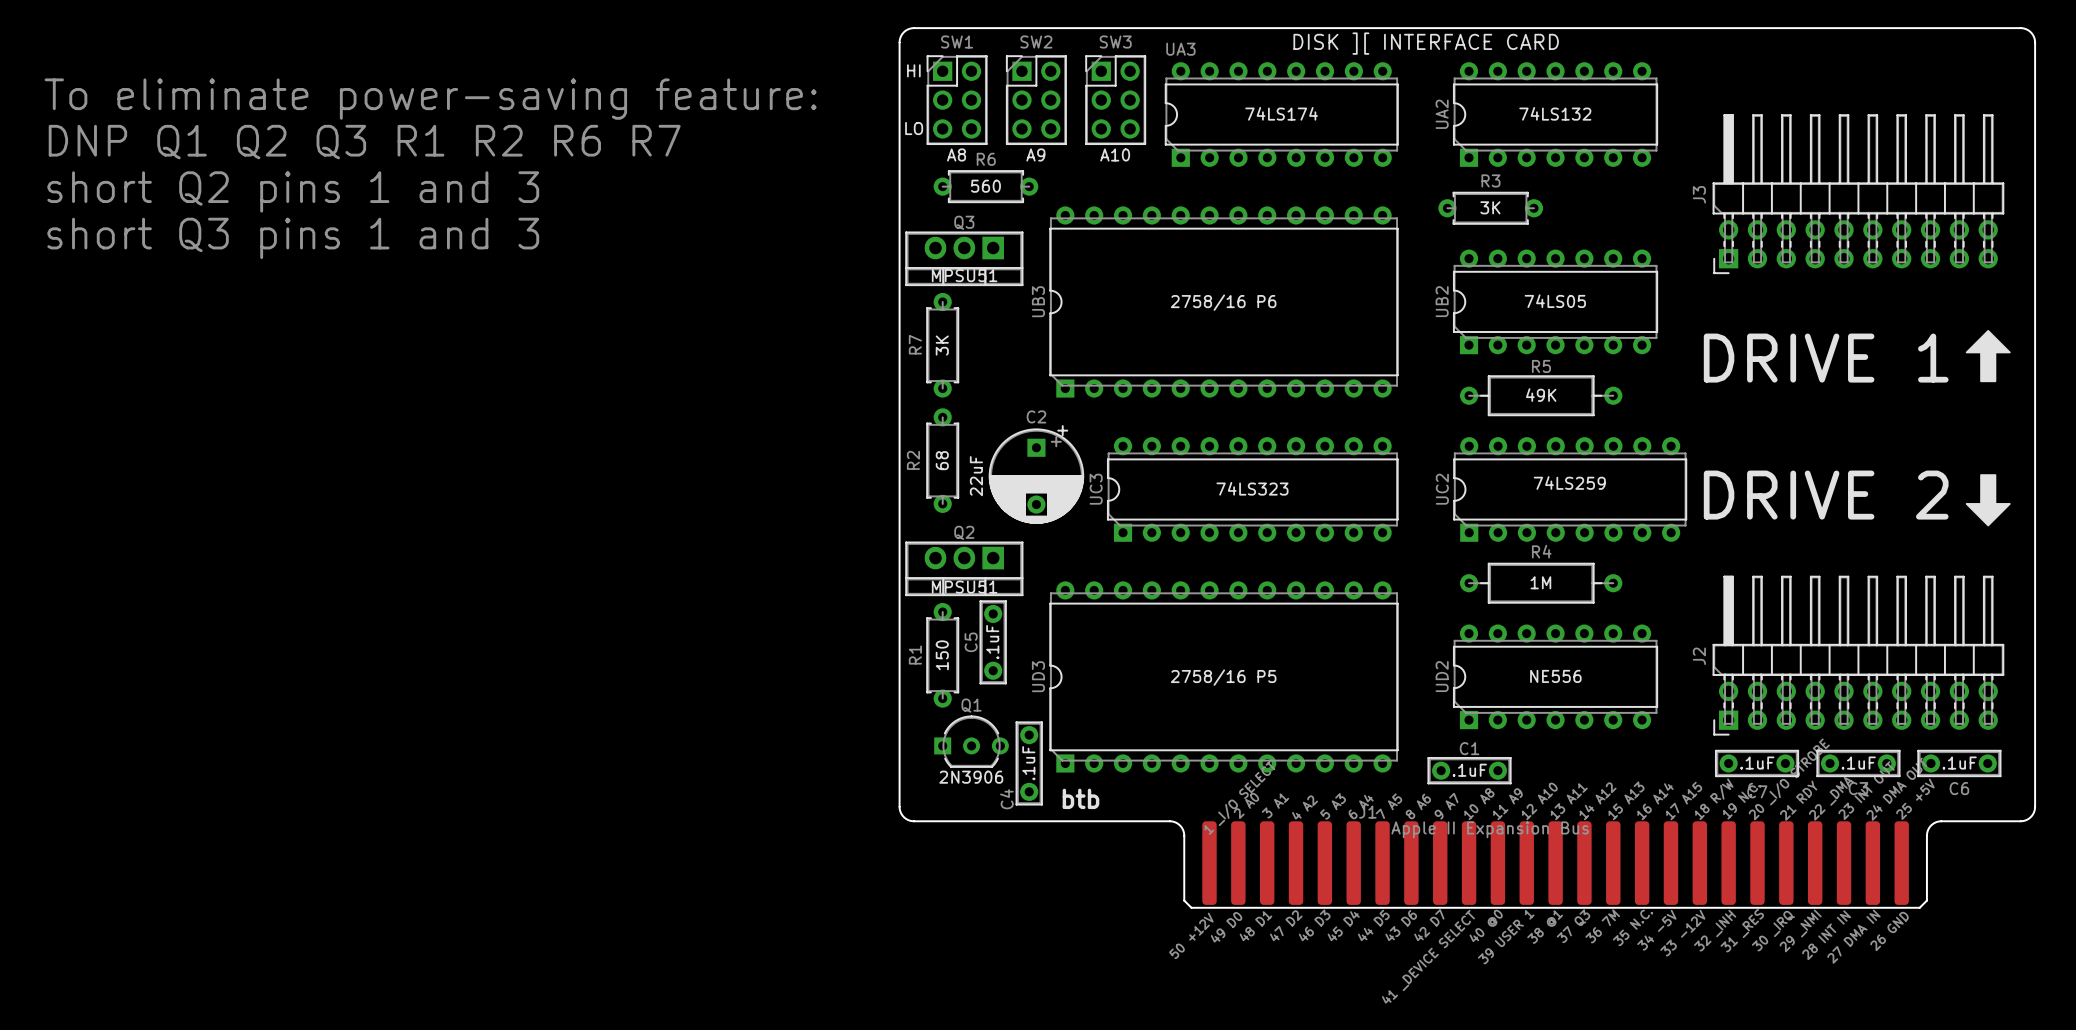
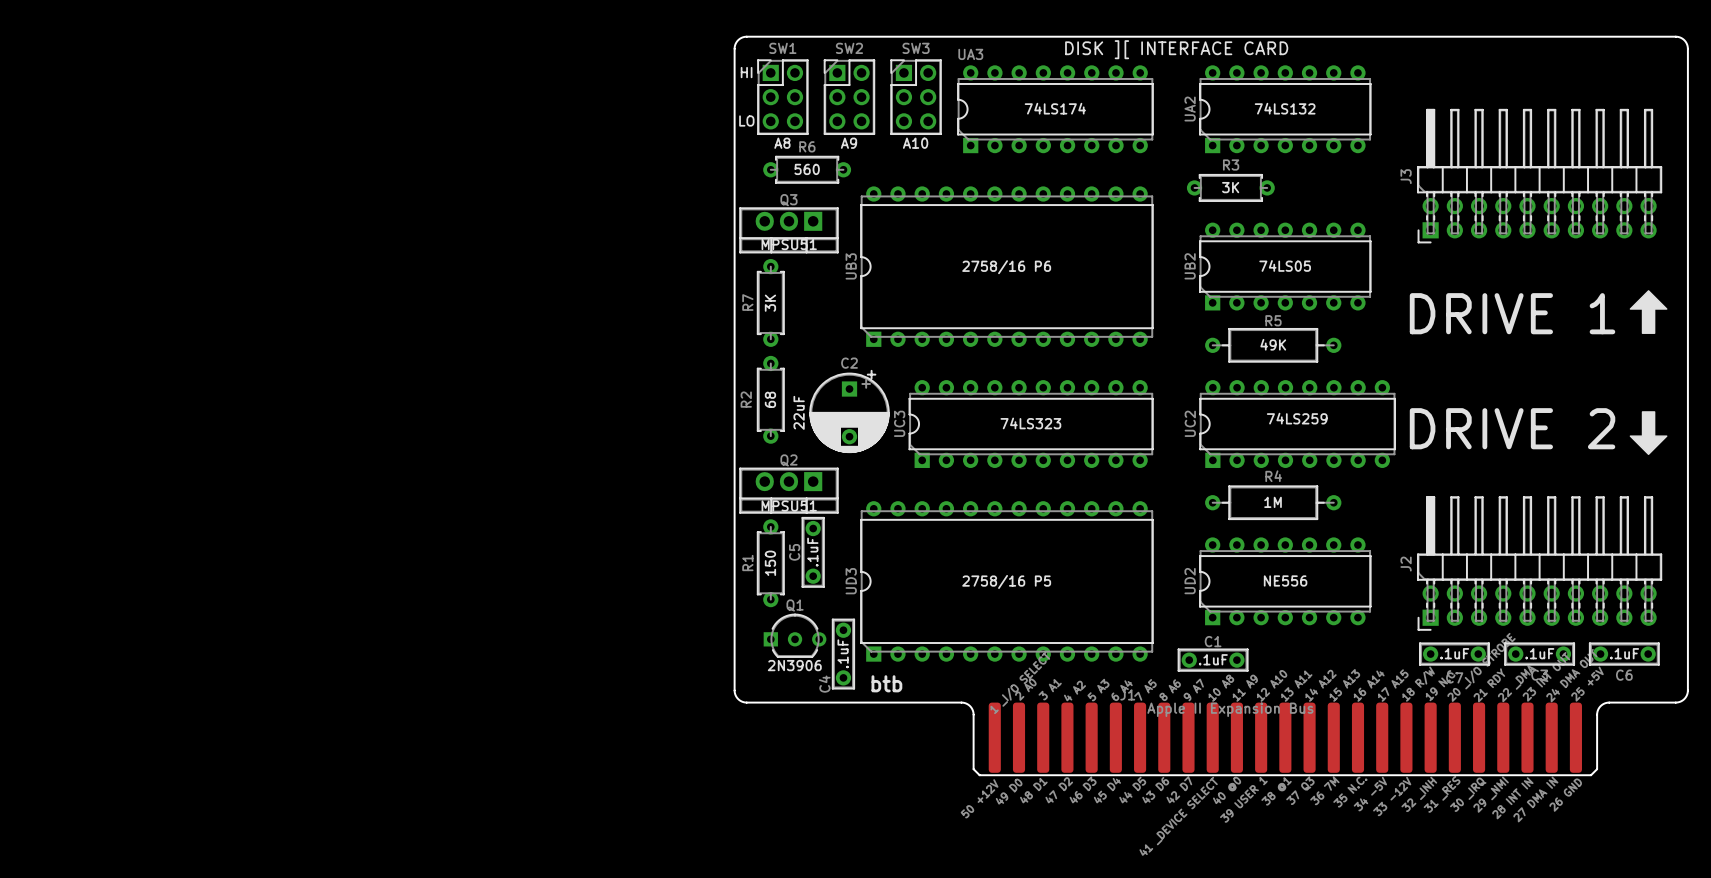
text: To eliminate power-saving feature: (430, 99) -> none
text: DNP Q1 Q2 Q3 R1 R2 R6 R7 (364, 142) -> none
text: short Q2 pins 1 and 3 (293, 191) -> none
text: short Q3 pins 1 and 3 (293, 238) -> none

